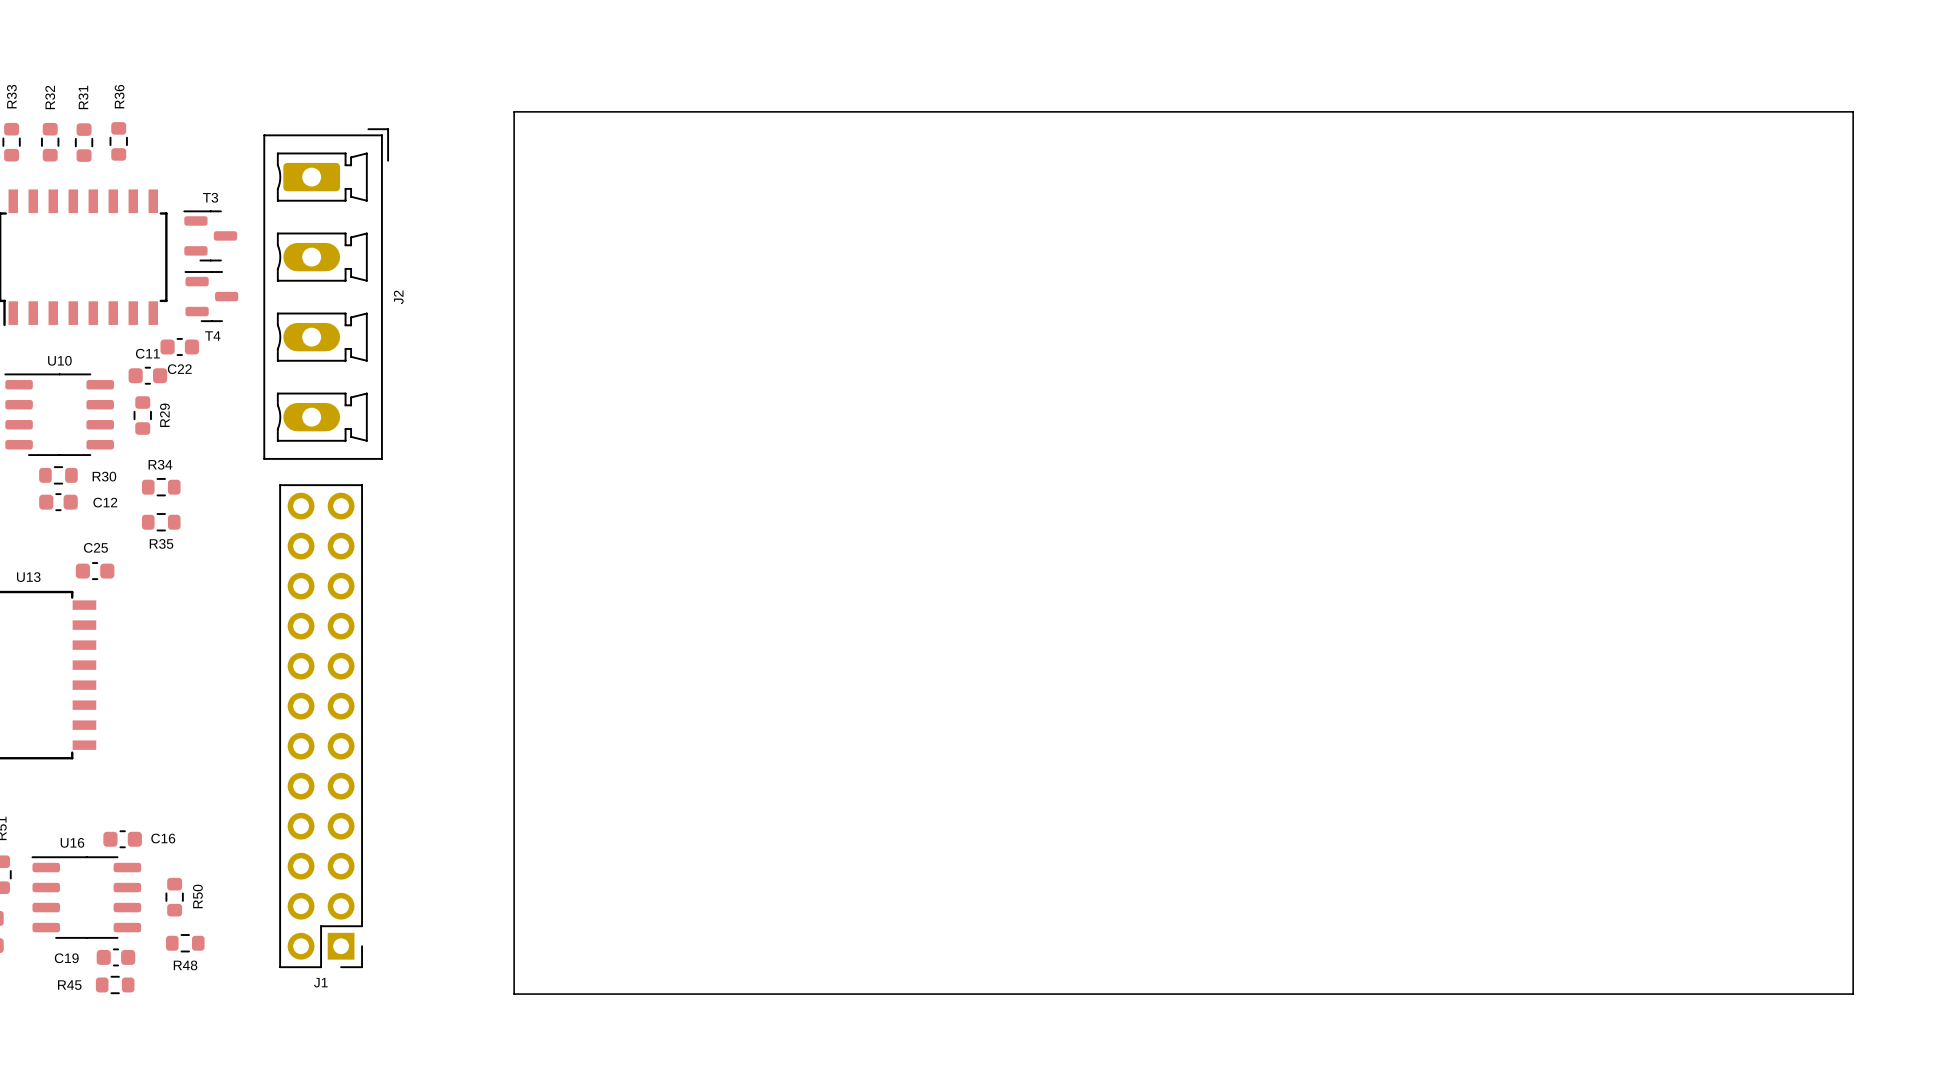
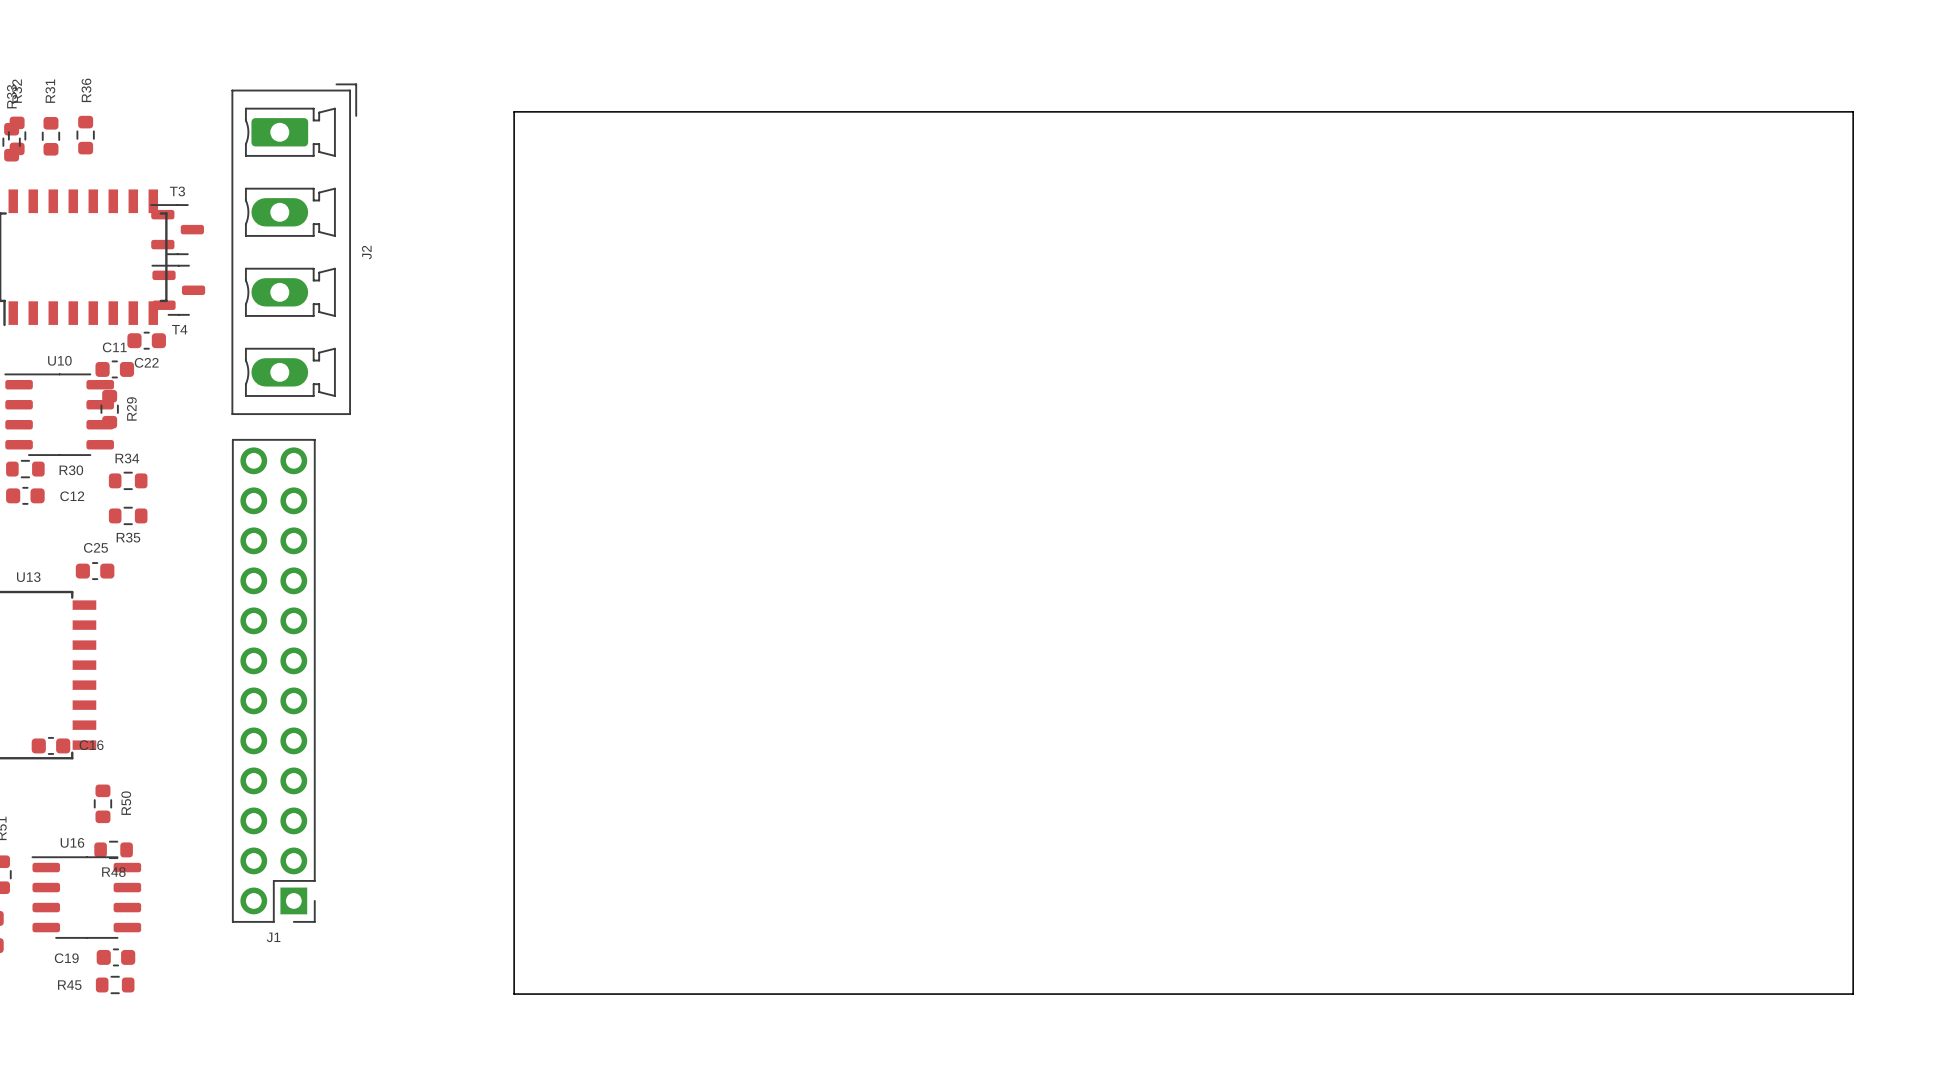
R36 position: (118, 141) -> (85, 135)
R32 position: (50, 142) -> (17, 135)
R31 position: (84, 142) -> (50, 136)
T3 position: (210, 235) -> (177, 229)
J2 position: (326, 294) -> (294, 249)
T4 position: (211, 296) -> (178, 290)
C22 position: (179, 346) -> (146, 340)
C11 position: (147, 375) -> (114, 369)
R29 position: (142, 415) -> (109, 409)
R30 position: (58, 475) -> (25, 469)
R34 position: (161, 487) -> (128, 480)
C12 position: (58, 502) -> (25, 495)
R35 position: (161, 522) -> (128, 515)
J1 position: (321, 726) -> (273, 680)
C16 position: (122, 839) -> (50, 745)
R50 position: (174, 897) -> (102, 803)
R48 position: (185, 943) -> (113, 849)

